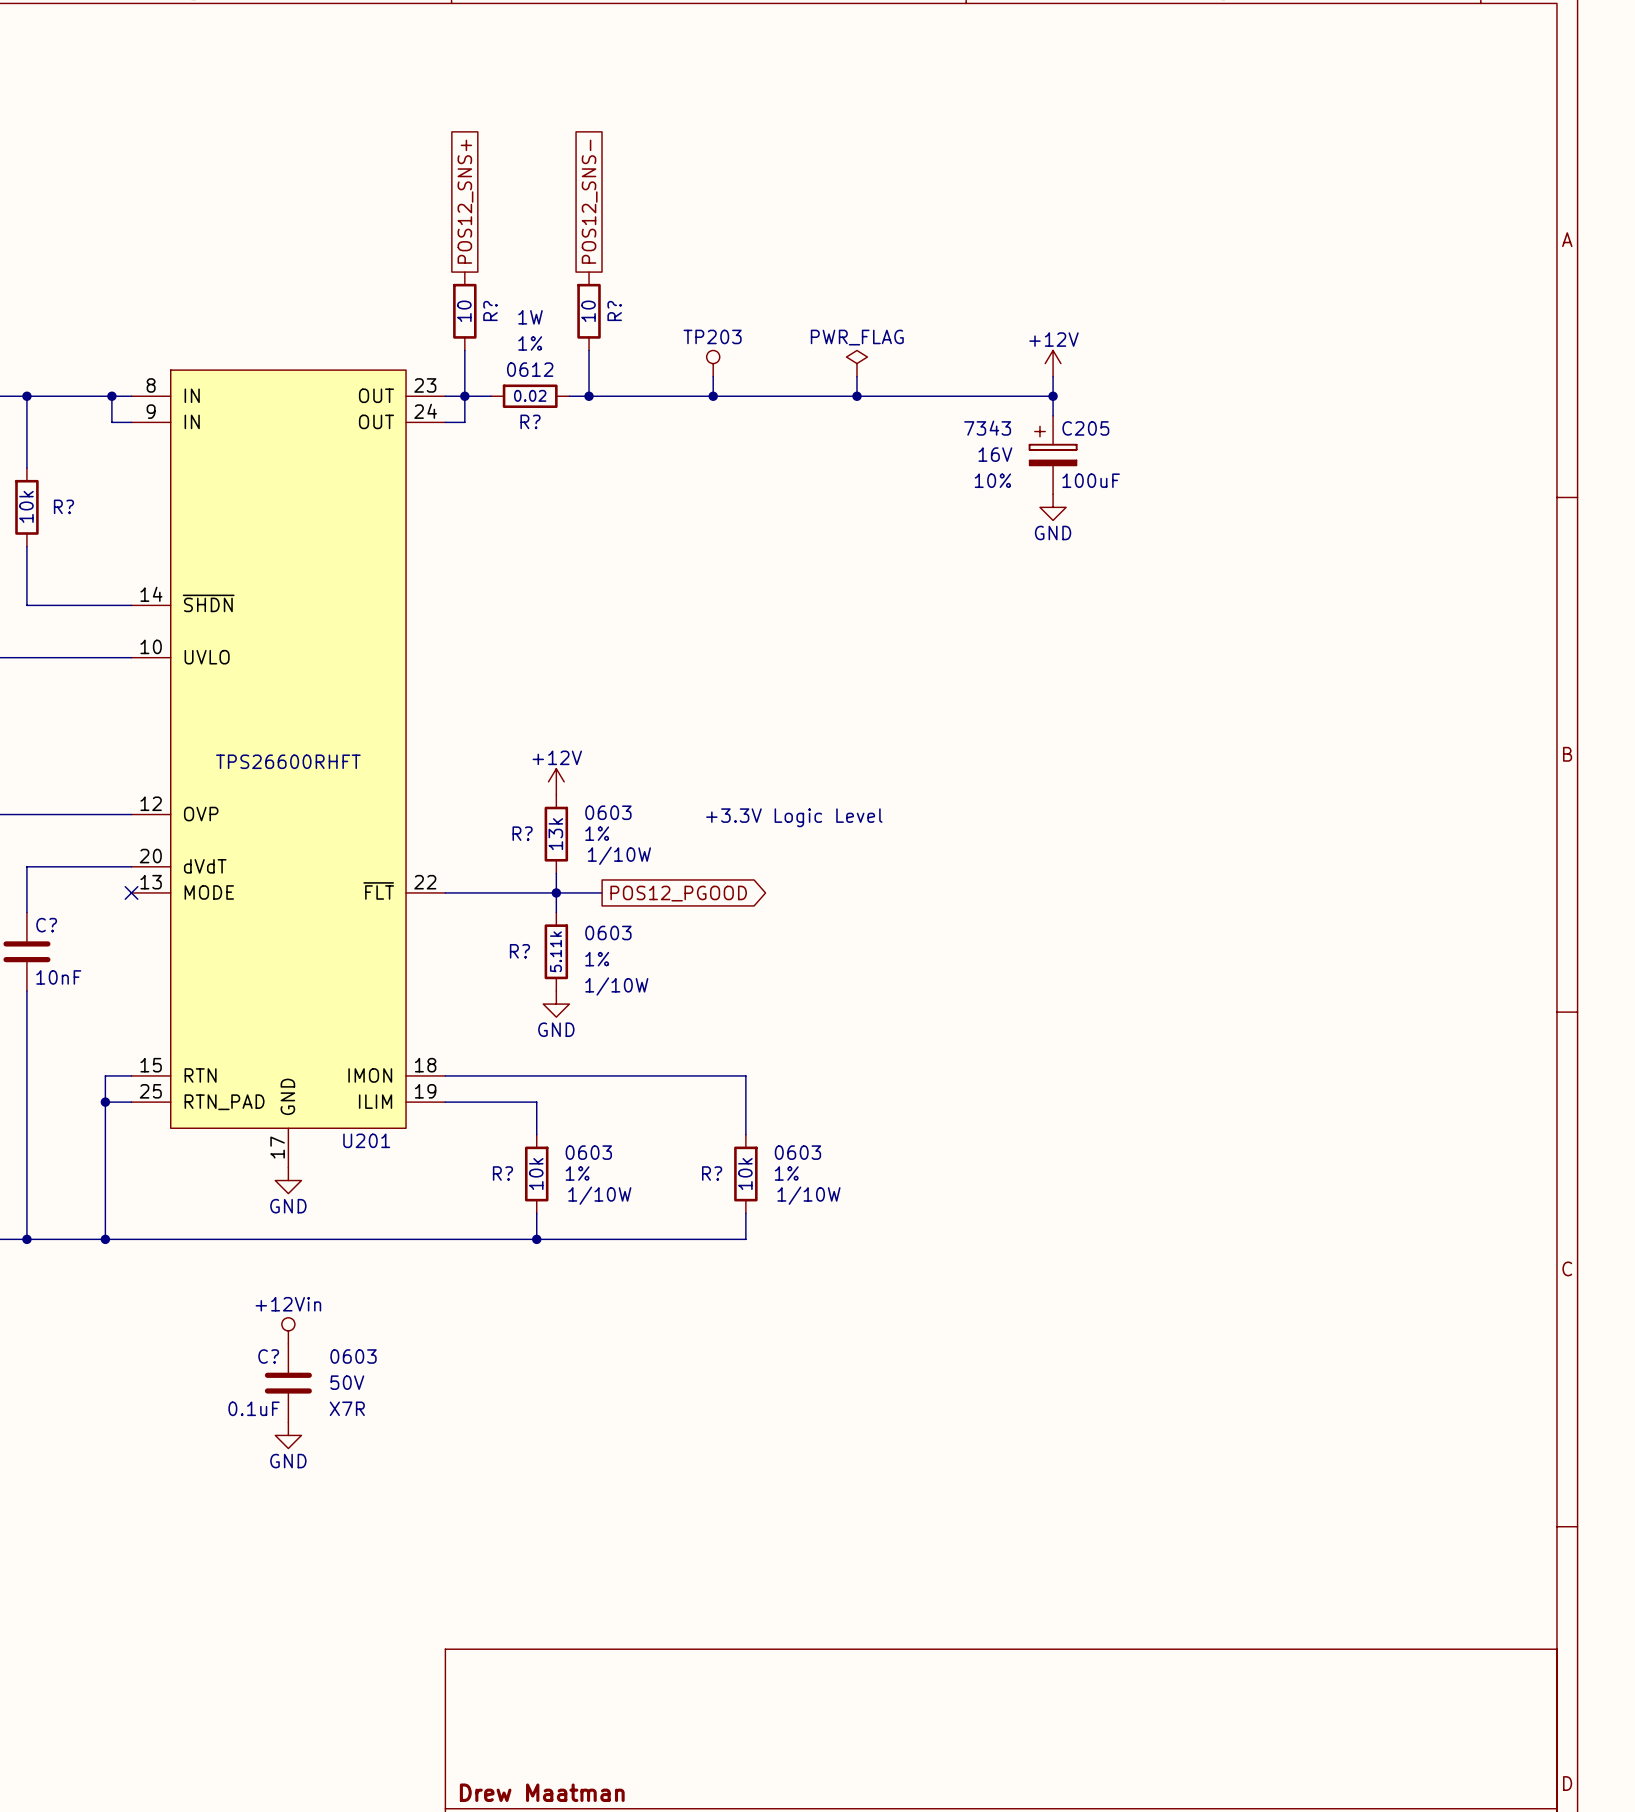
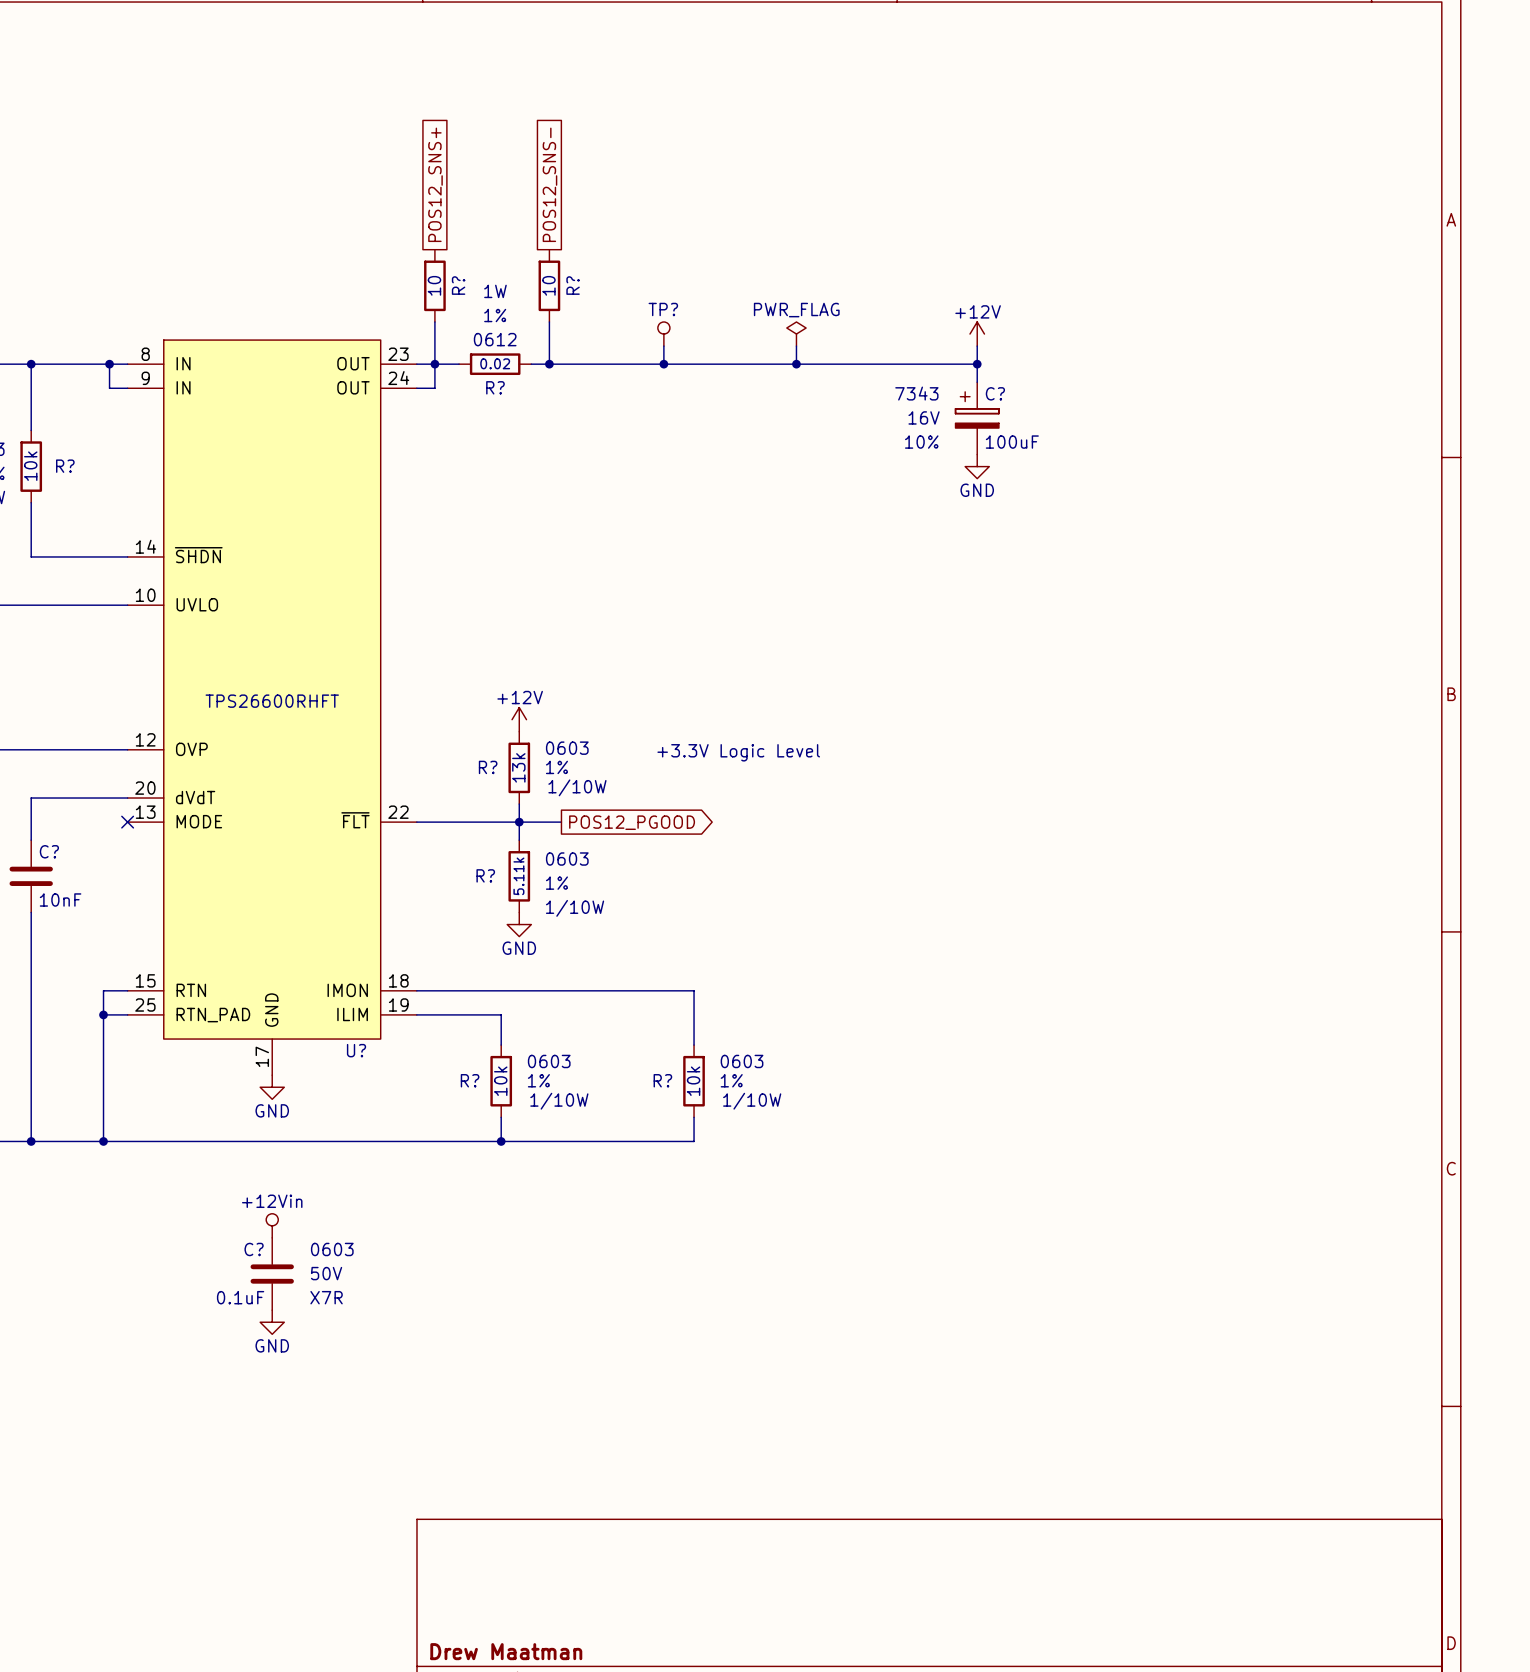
TP203 name: TP203 (712, 336) -> TP? (663, 309)
C205 name: C205 (1085, 428) -> C? (995, 393)
U201 name: U201 (366, 1140) -> U? (356, 1050)

